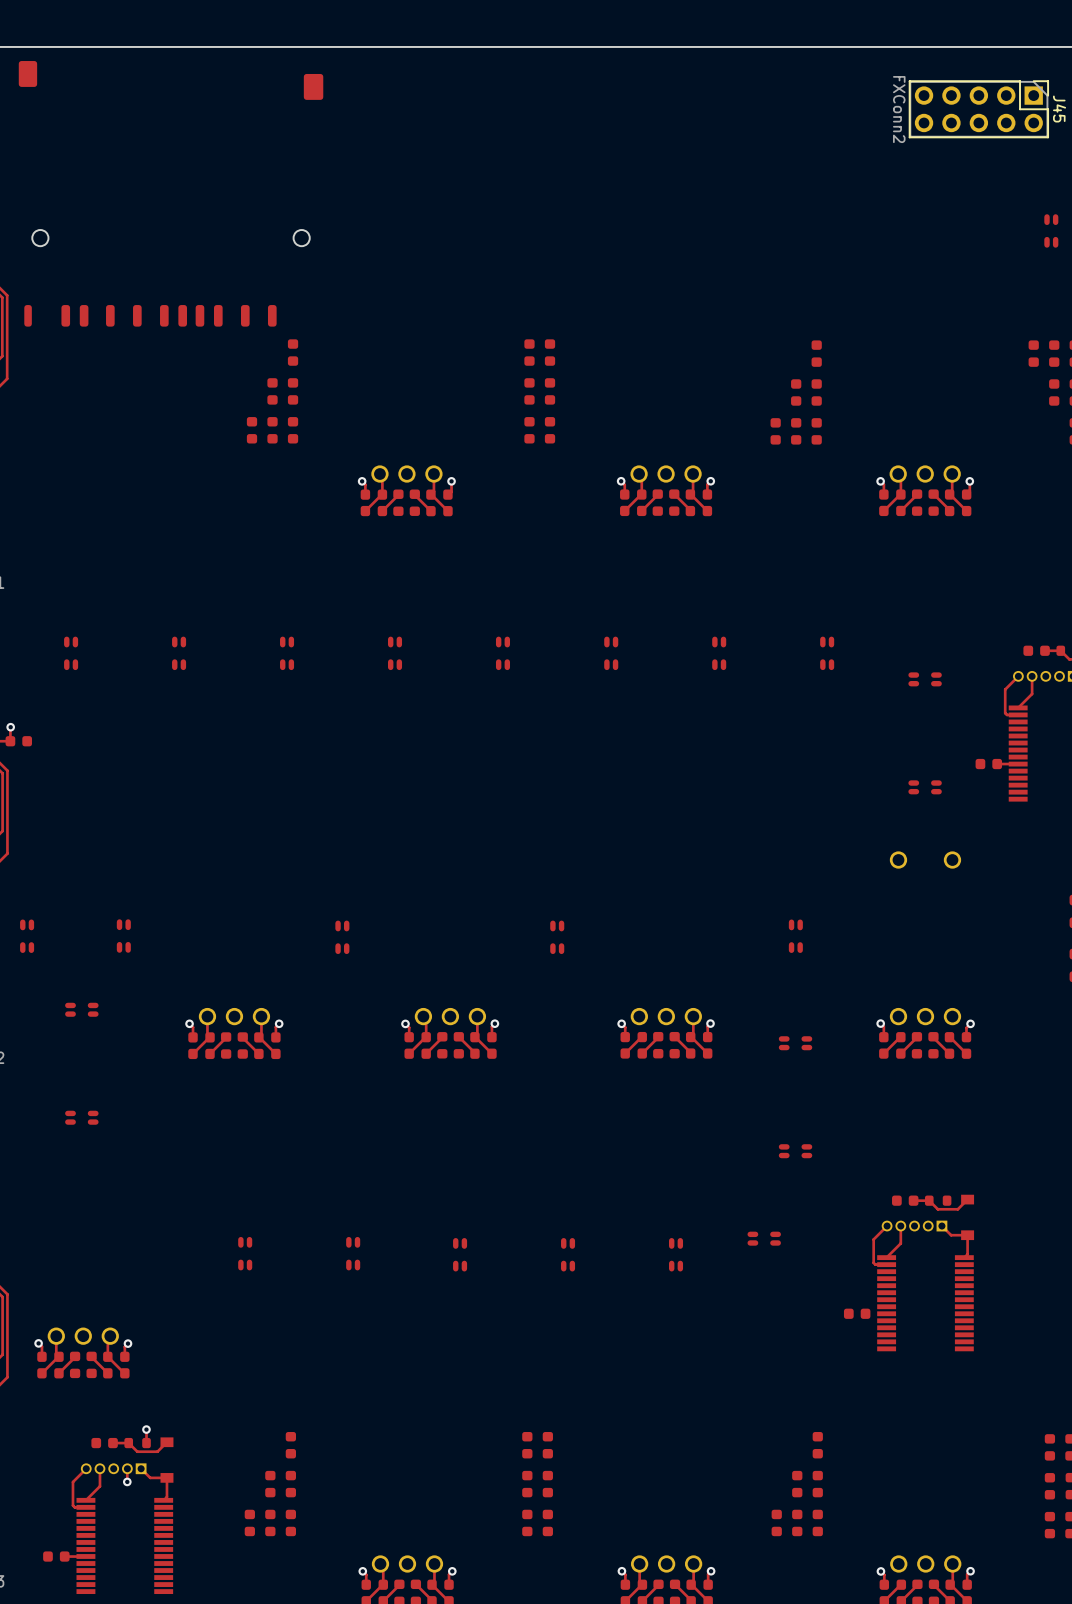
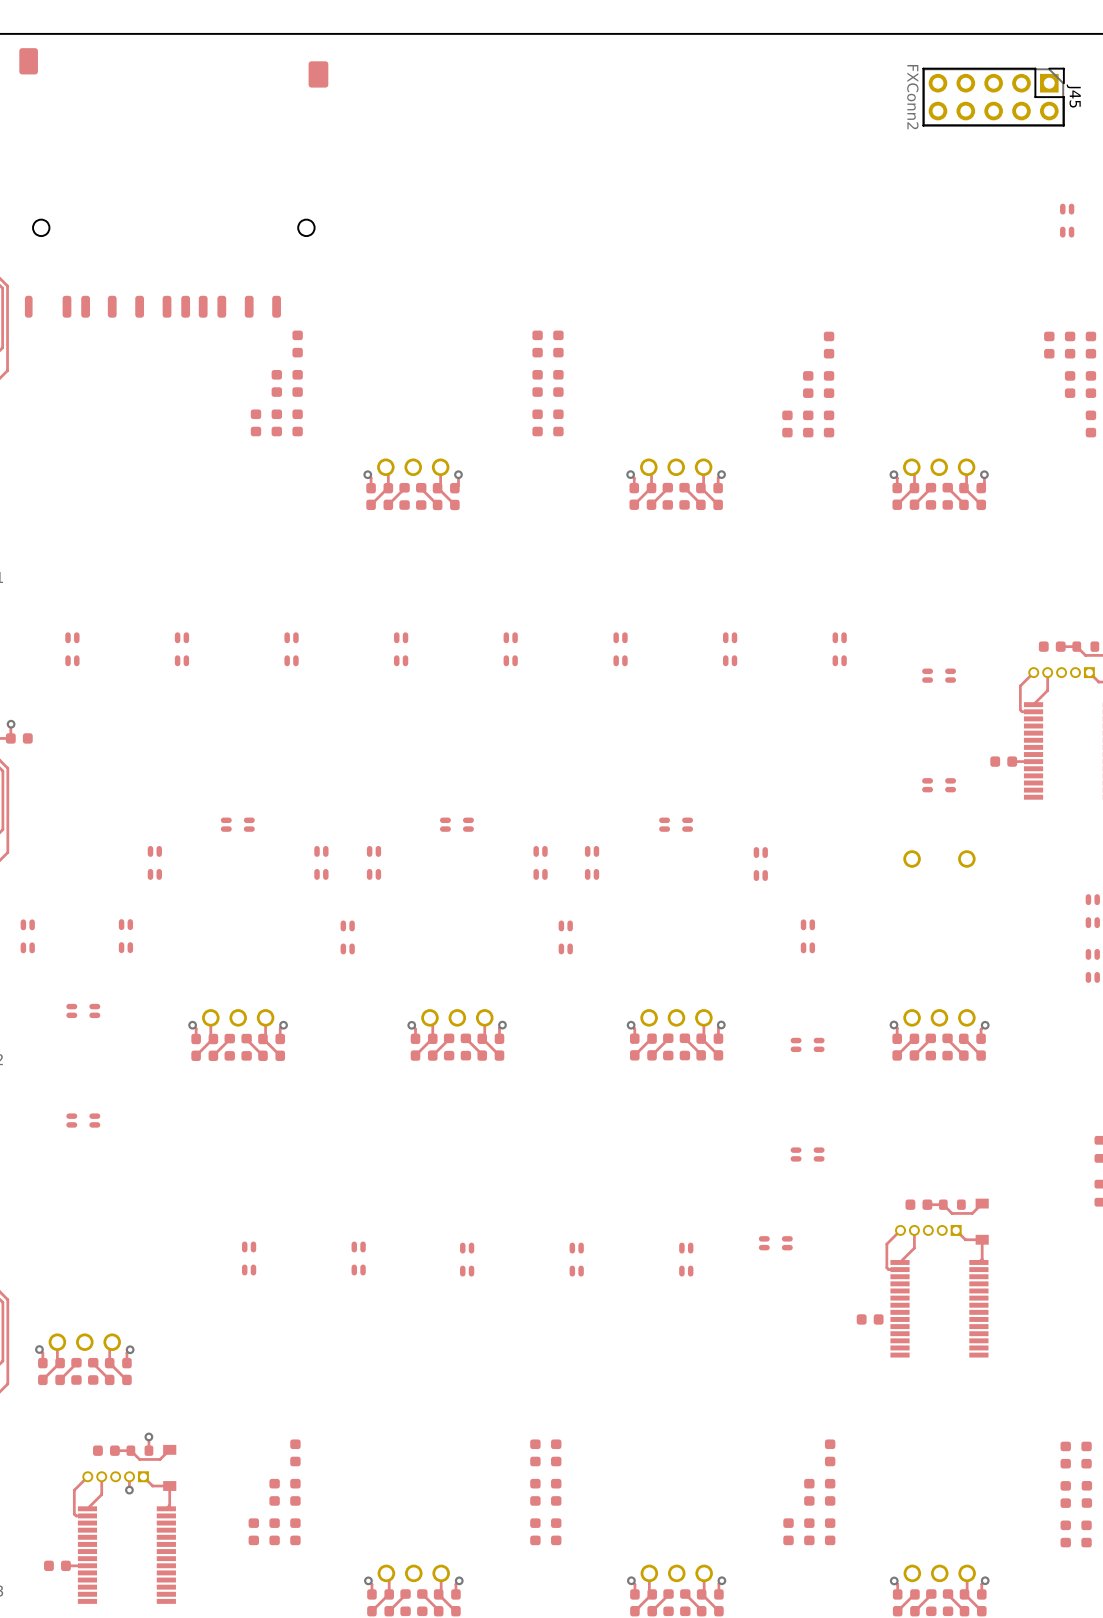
part: none -> (237, 824)
part: none -> (456, 824)
part: none -> (676, 824)
part: none -> (154, 862)
part: none -> (321, 862)
part: none -> (374, 862)
part: none -> (540, 862)
part: none -> (592, 862)
part: none -> (760, 864)

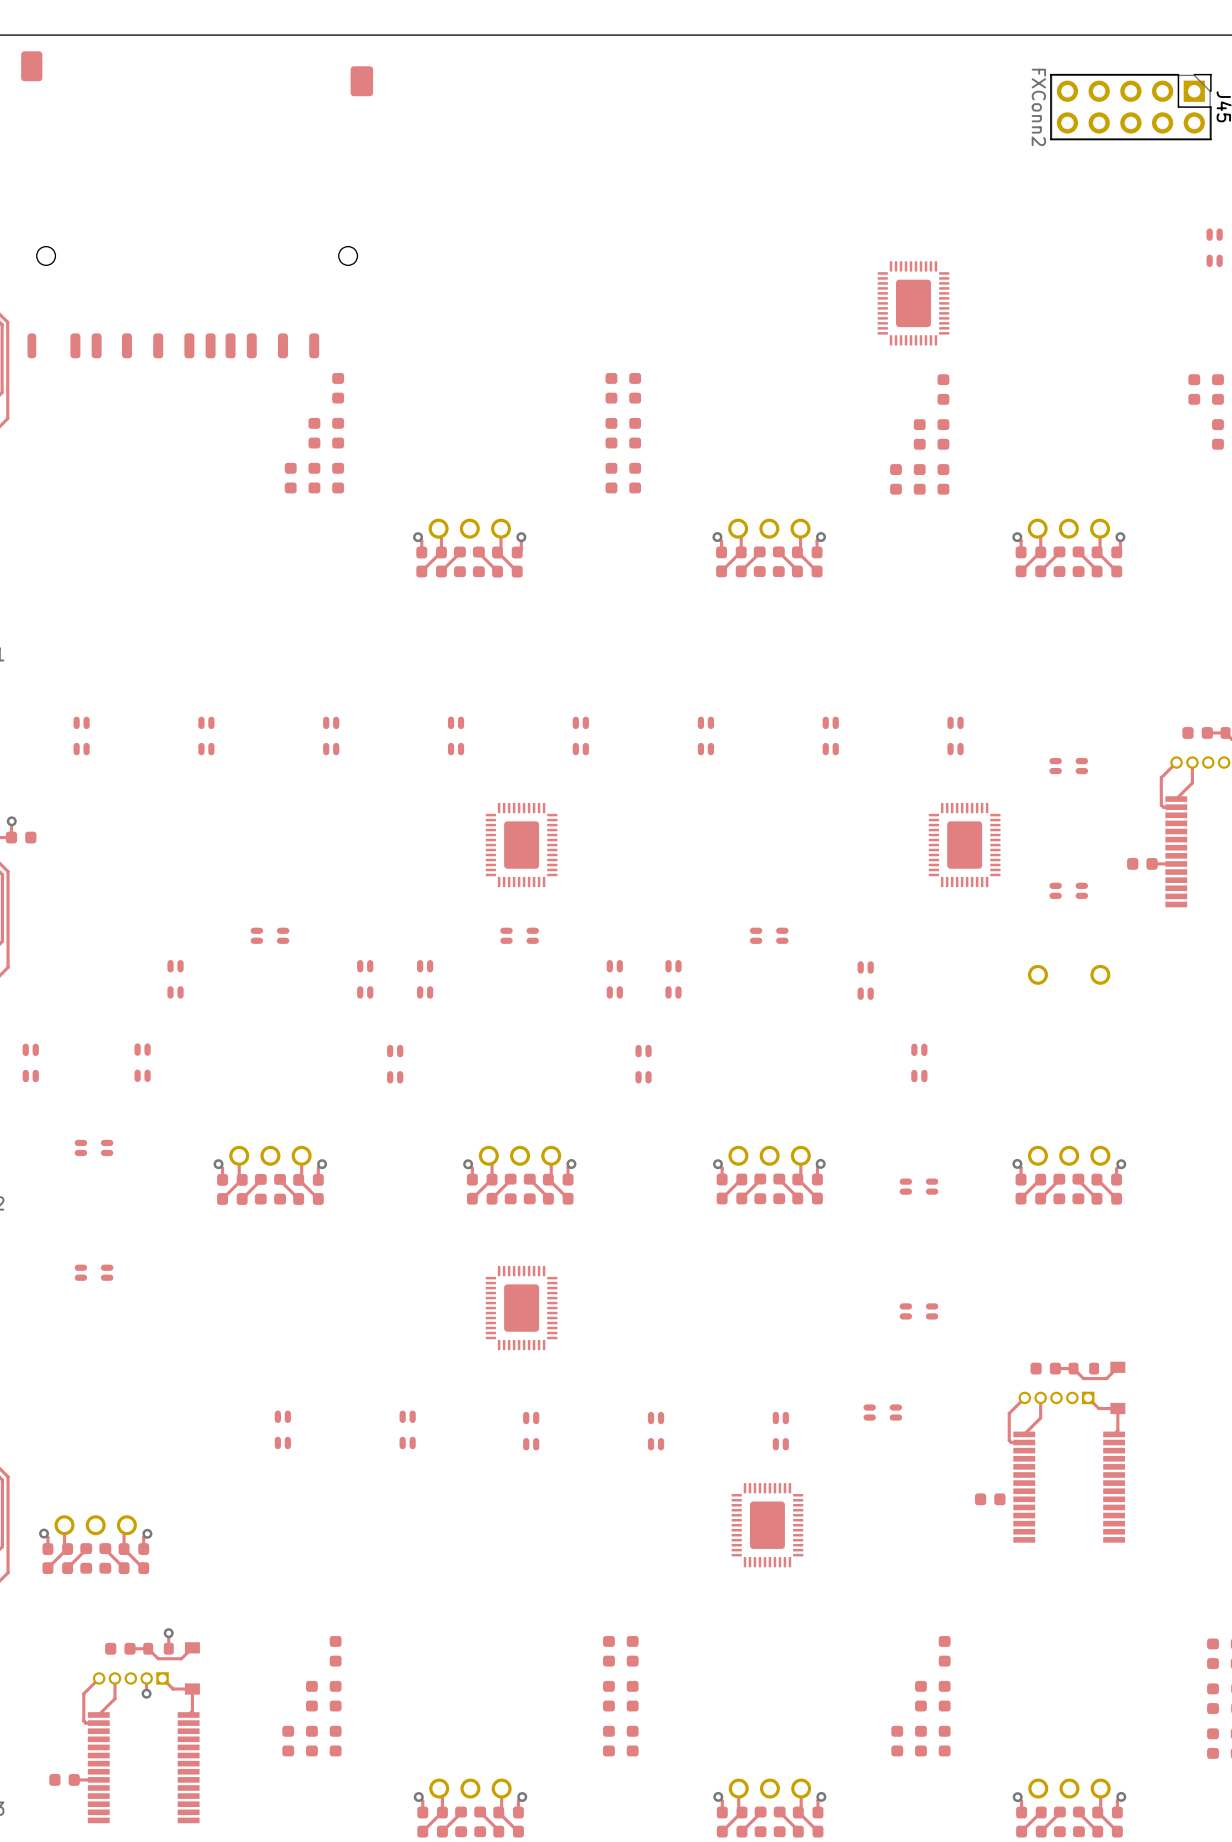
part: none -> (913, 303)
part: none -> (521, 845)
part: none -> (964, 845)
part: none -> (521, 1308)
part: none -> (767, 1525)

